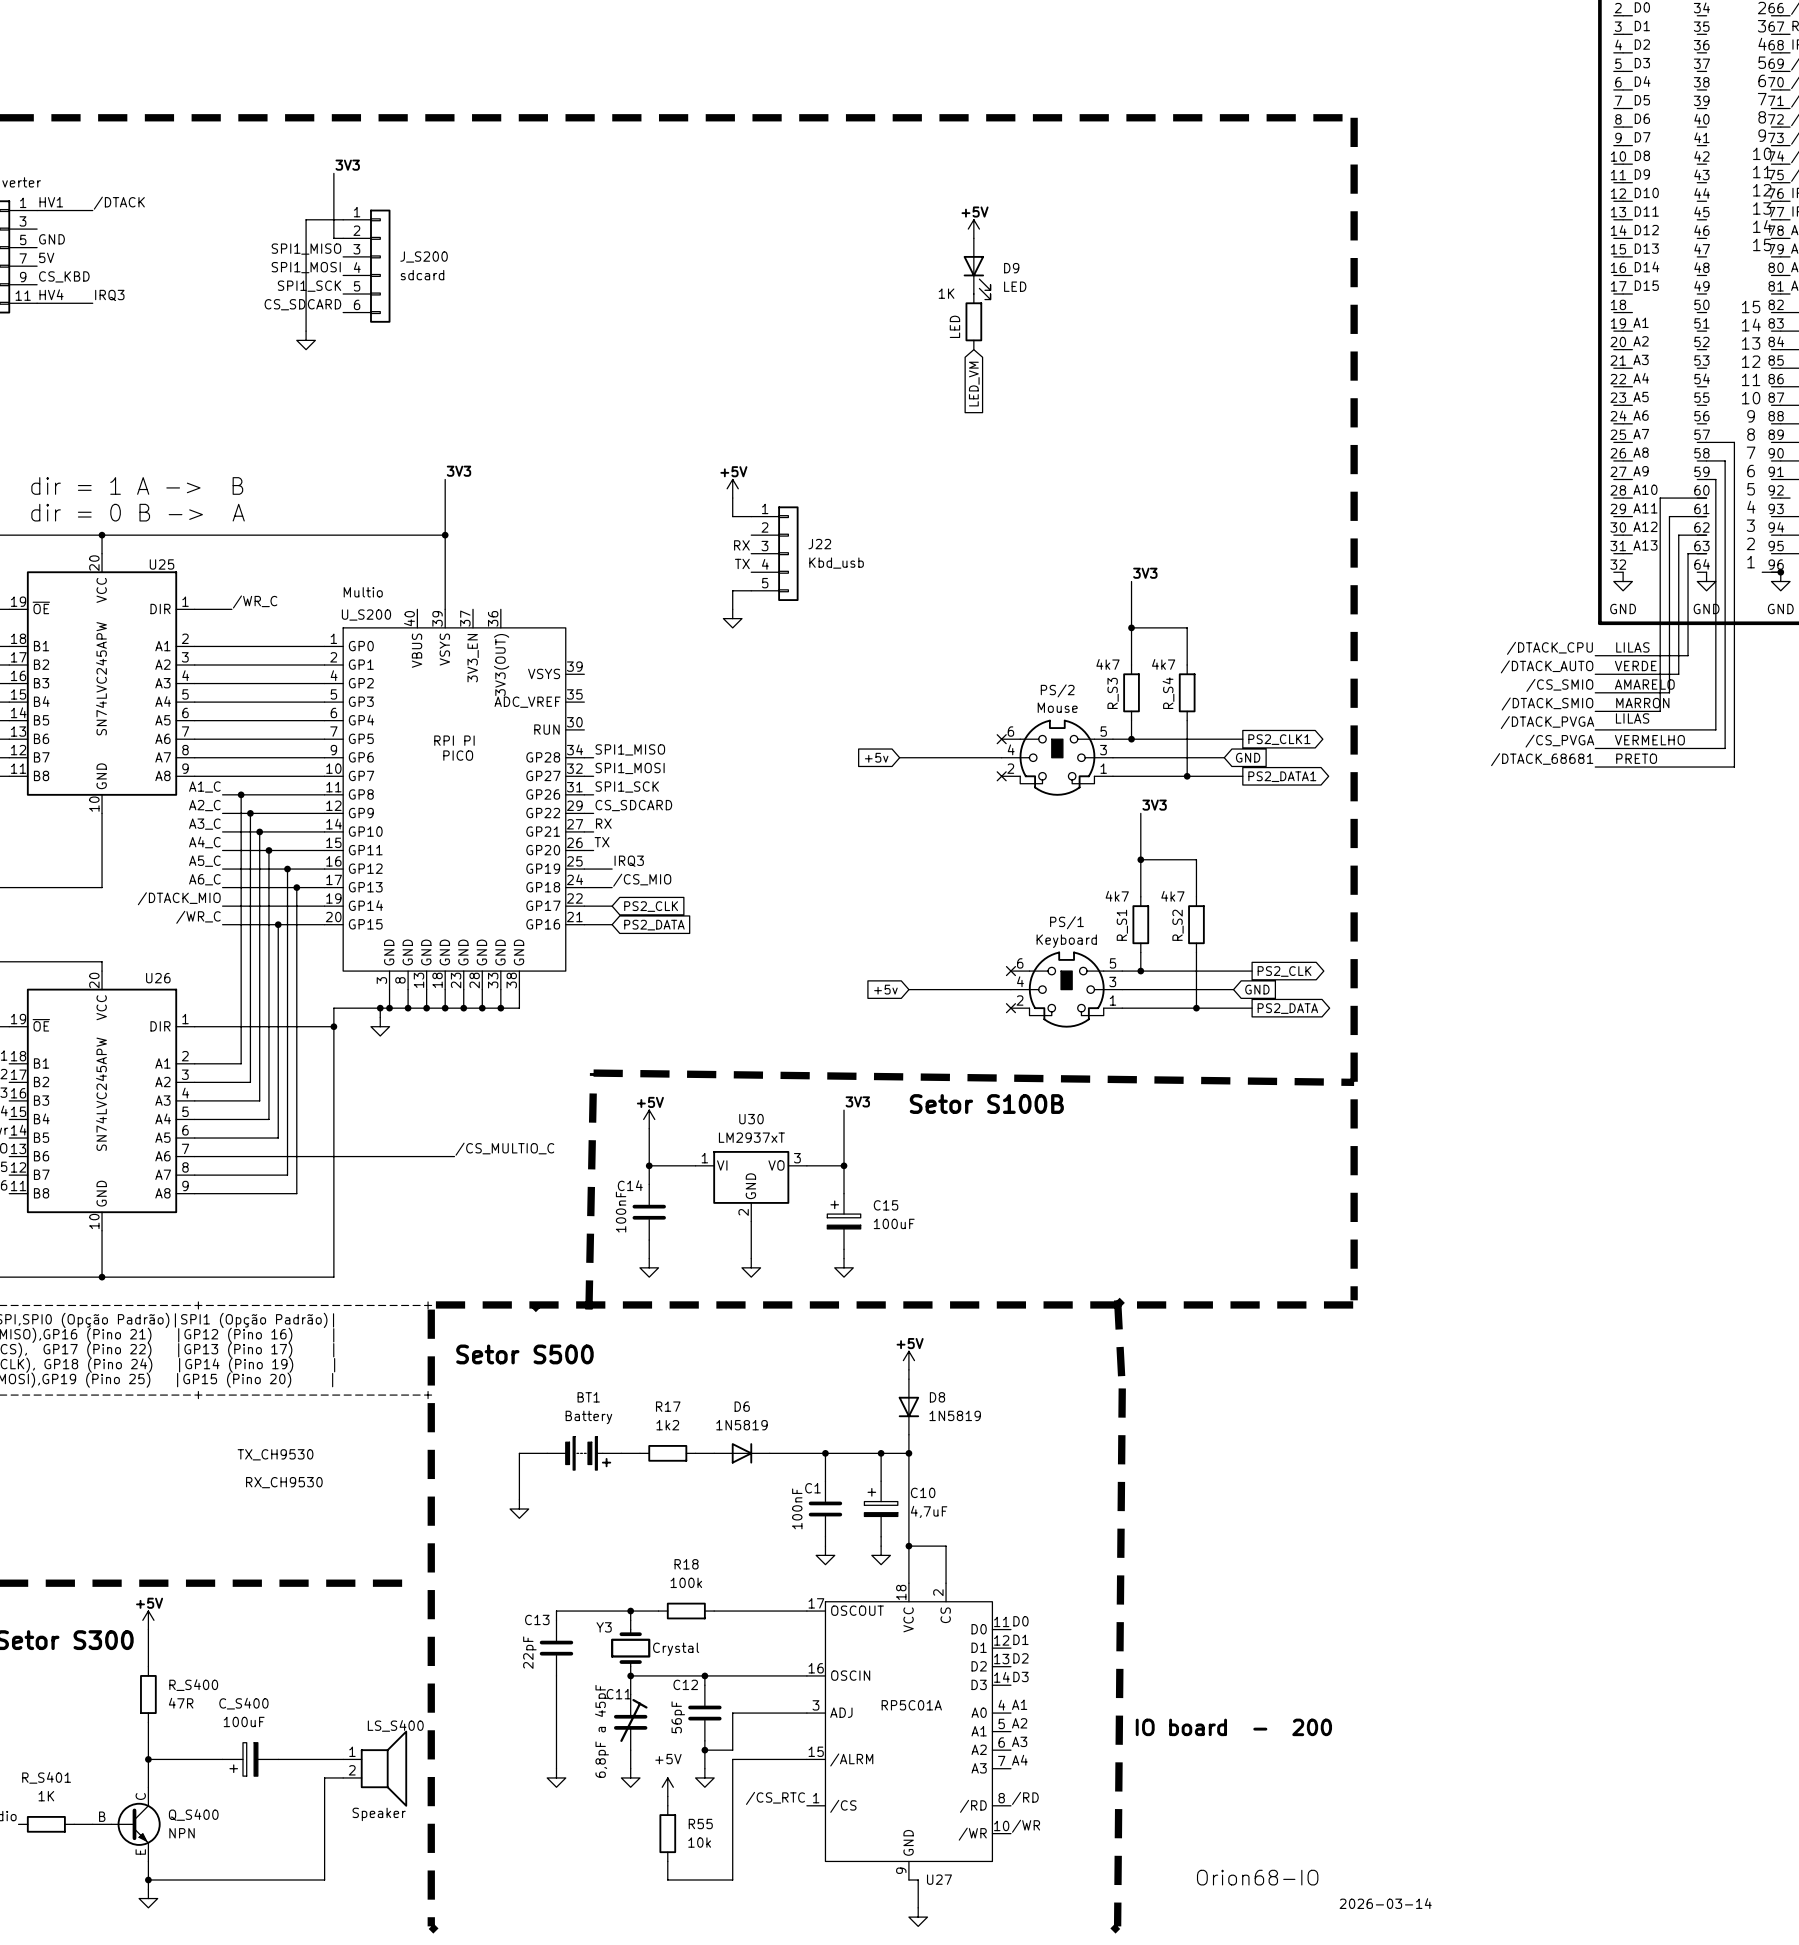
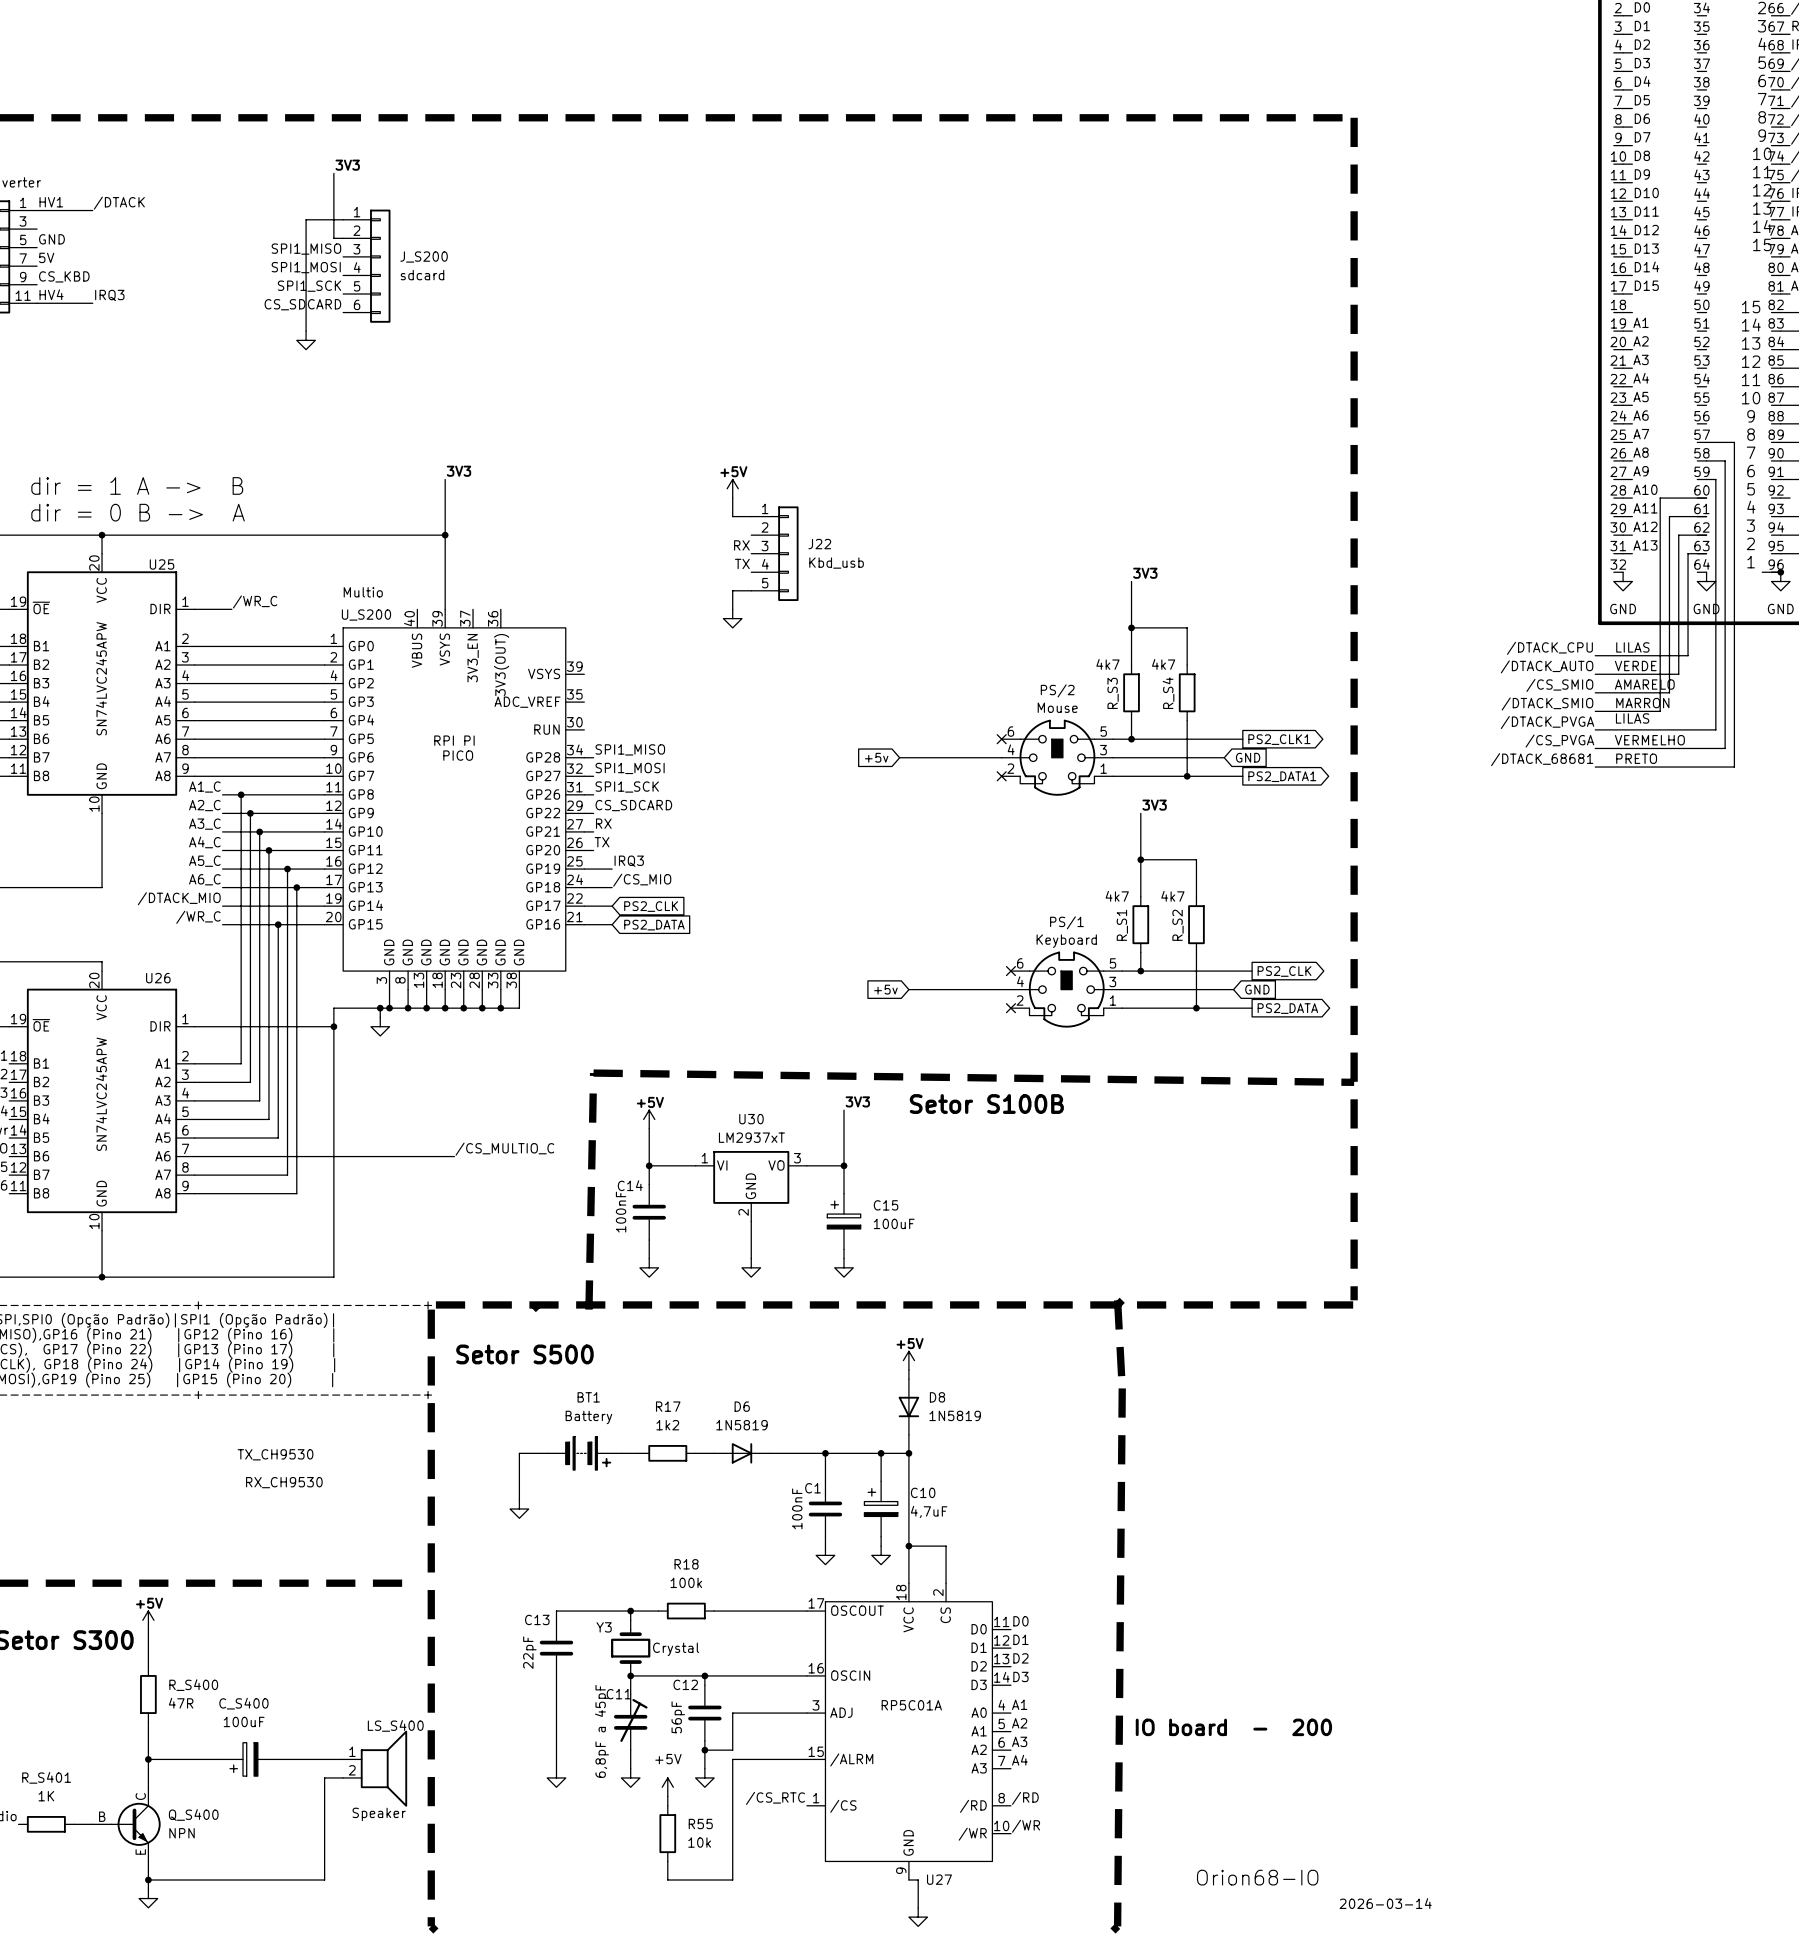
power symbol: +5V (973, 229) -> none
D9: LED (977, 268) -> none
LED: 1K (973, 321) -> none
global label: LED_VM (974, 384) -> none

